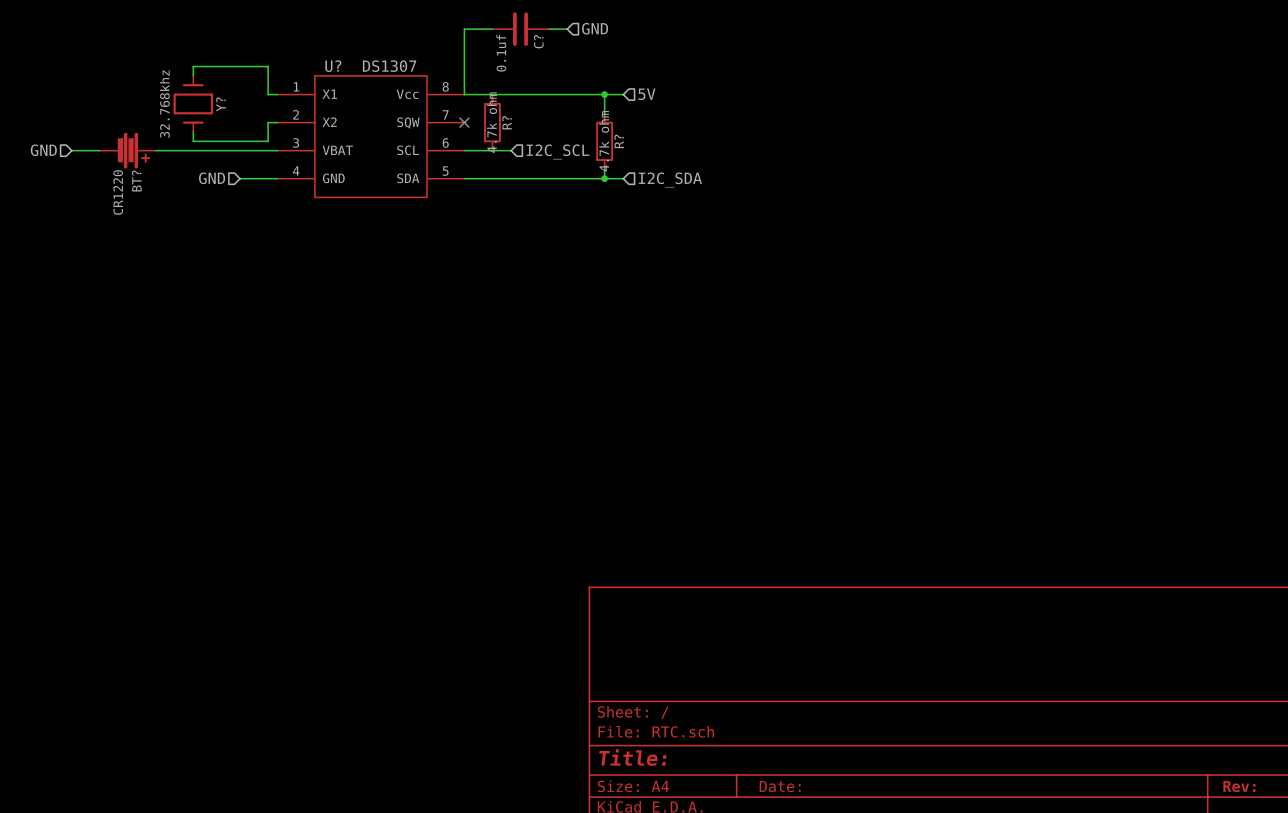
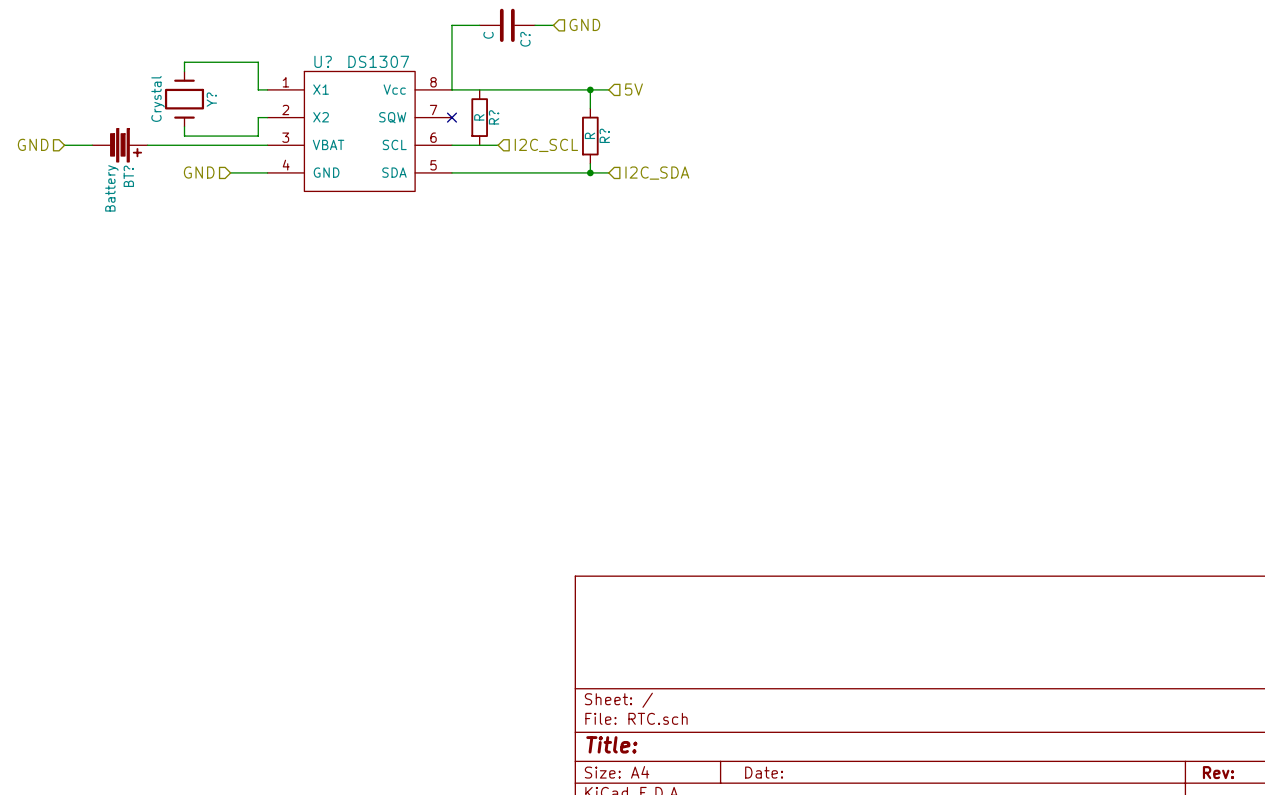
C? value: 0.1uf (501, 53) -> C (488, 35)
Y? value: 32.768khz (164, 104) -> Crystal (158, 98)
R? value: 4.7k ohm (492, 122) -> R (479, 117)
R? value: 4.7k ohm (604, 141) -> R (590, 135)
BT? value: CR1220 (118, 192) -> Battery (111, 188)

